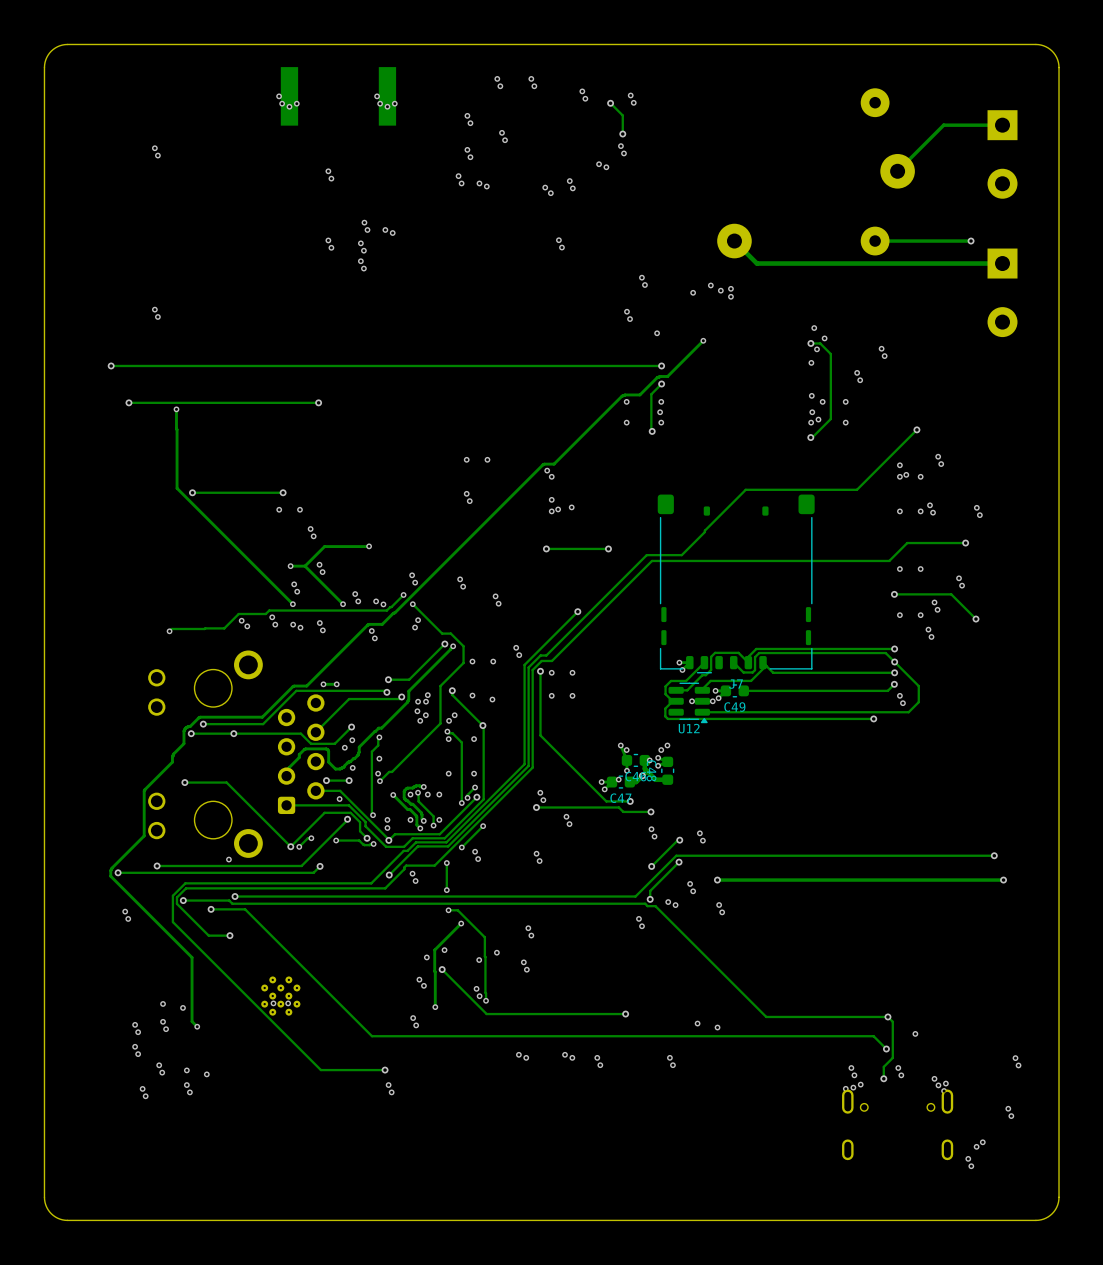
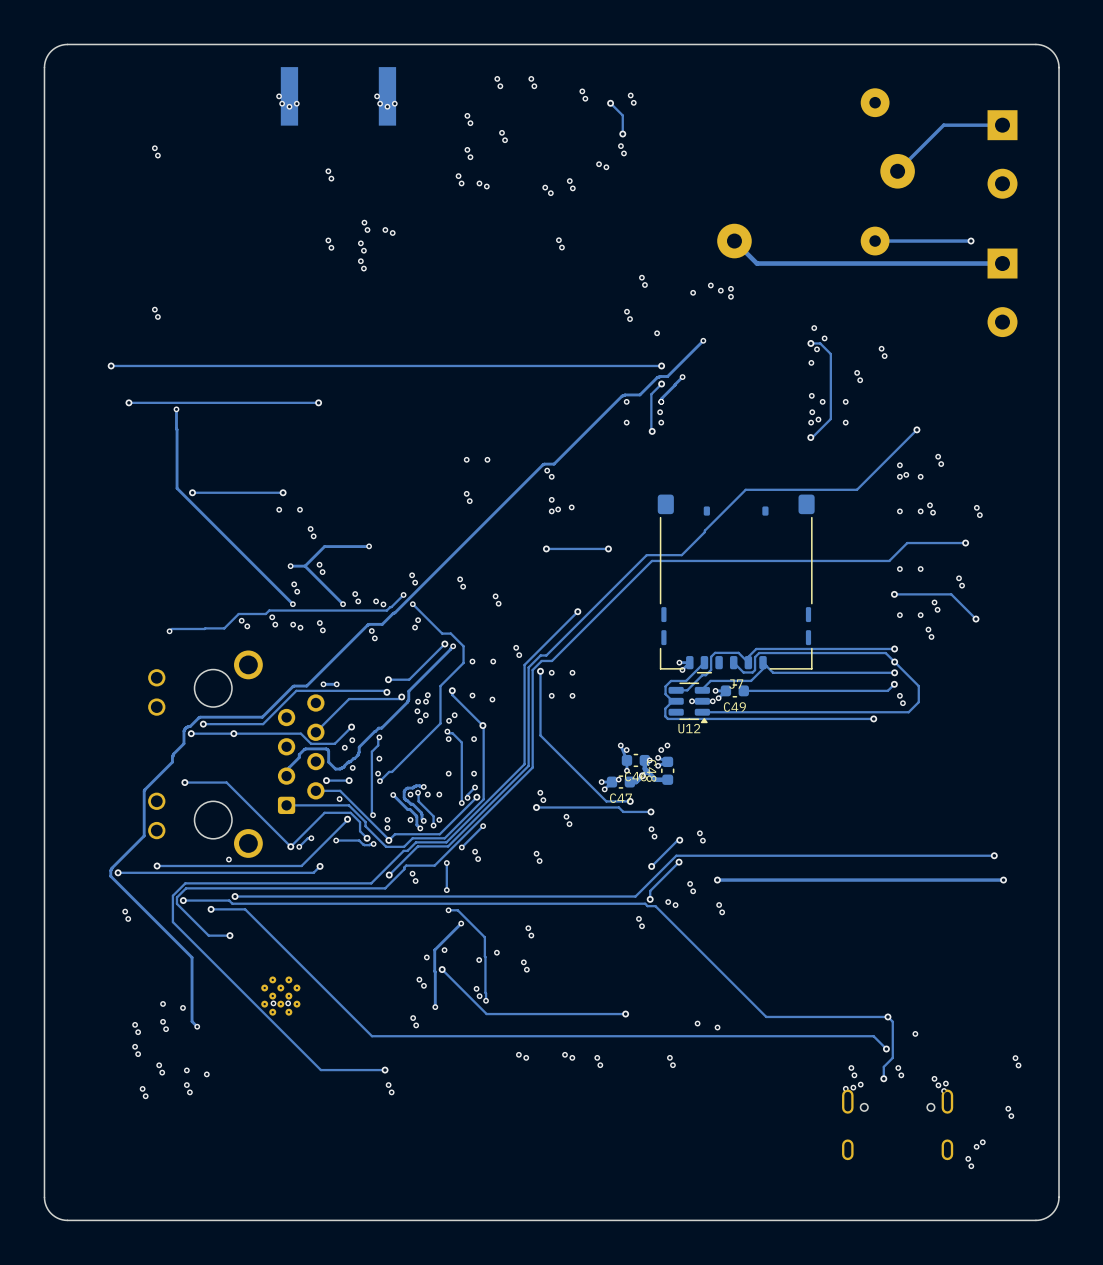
track: none -> (682, 377) (661, 398) (661, 401)
via: none -> (682, 377)

